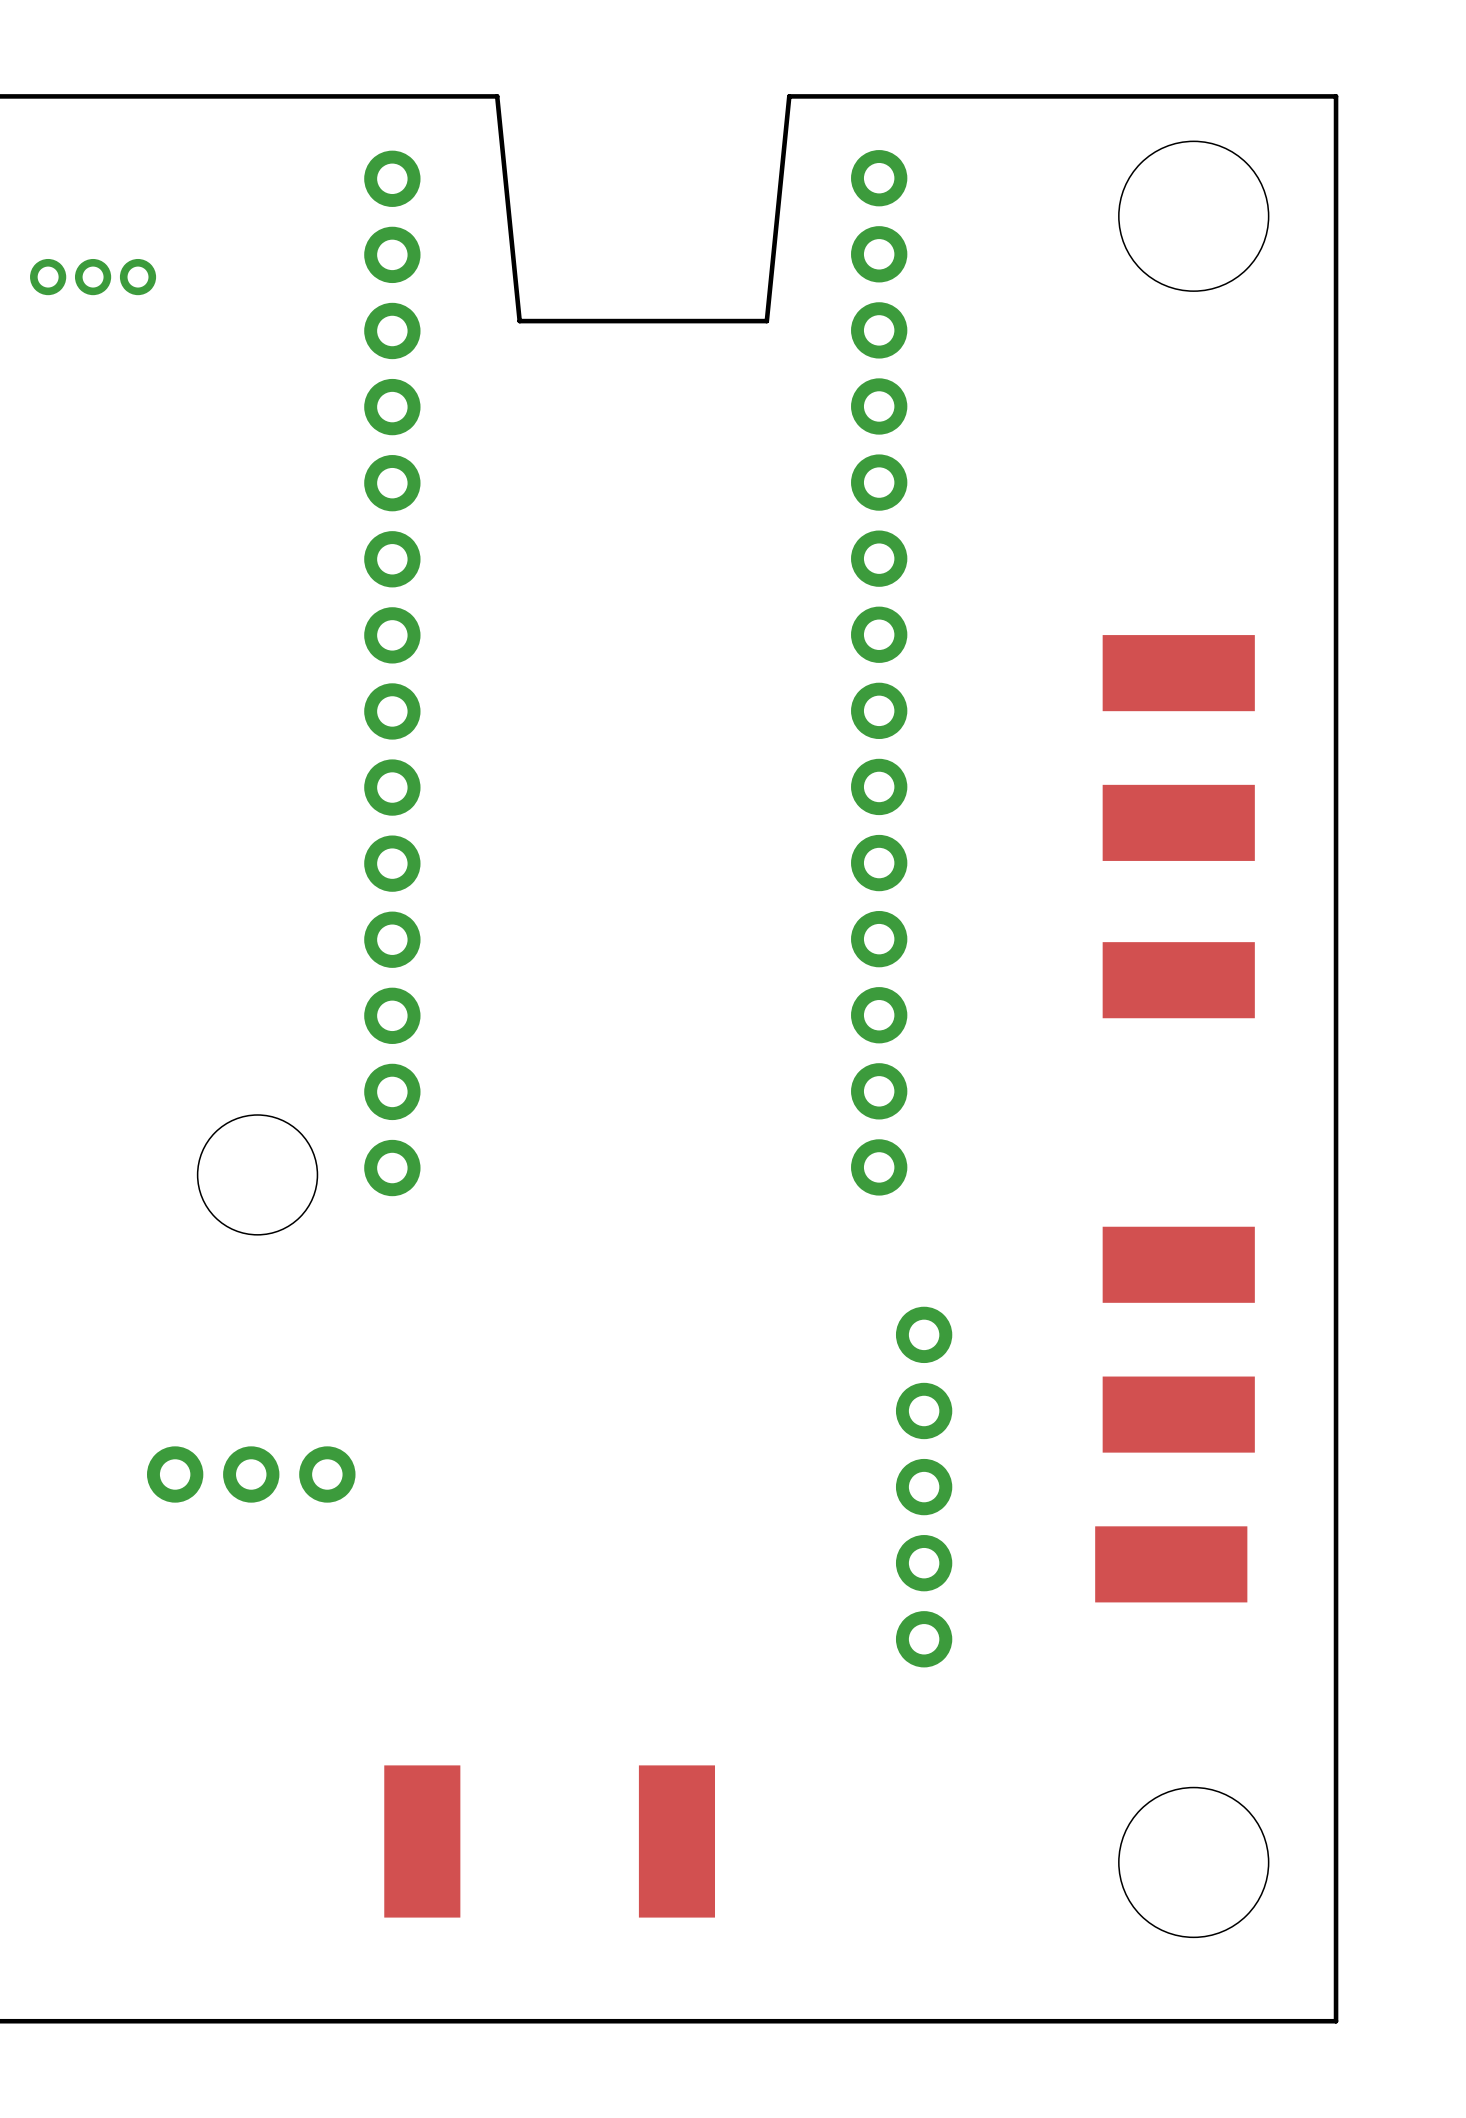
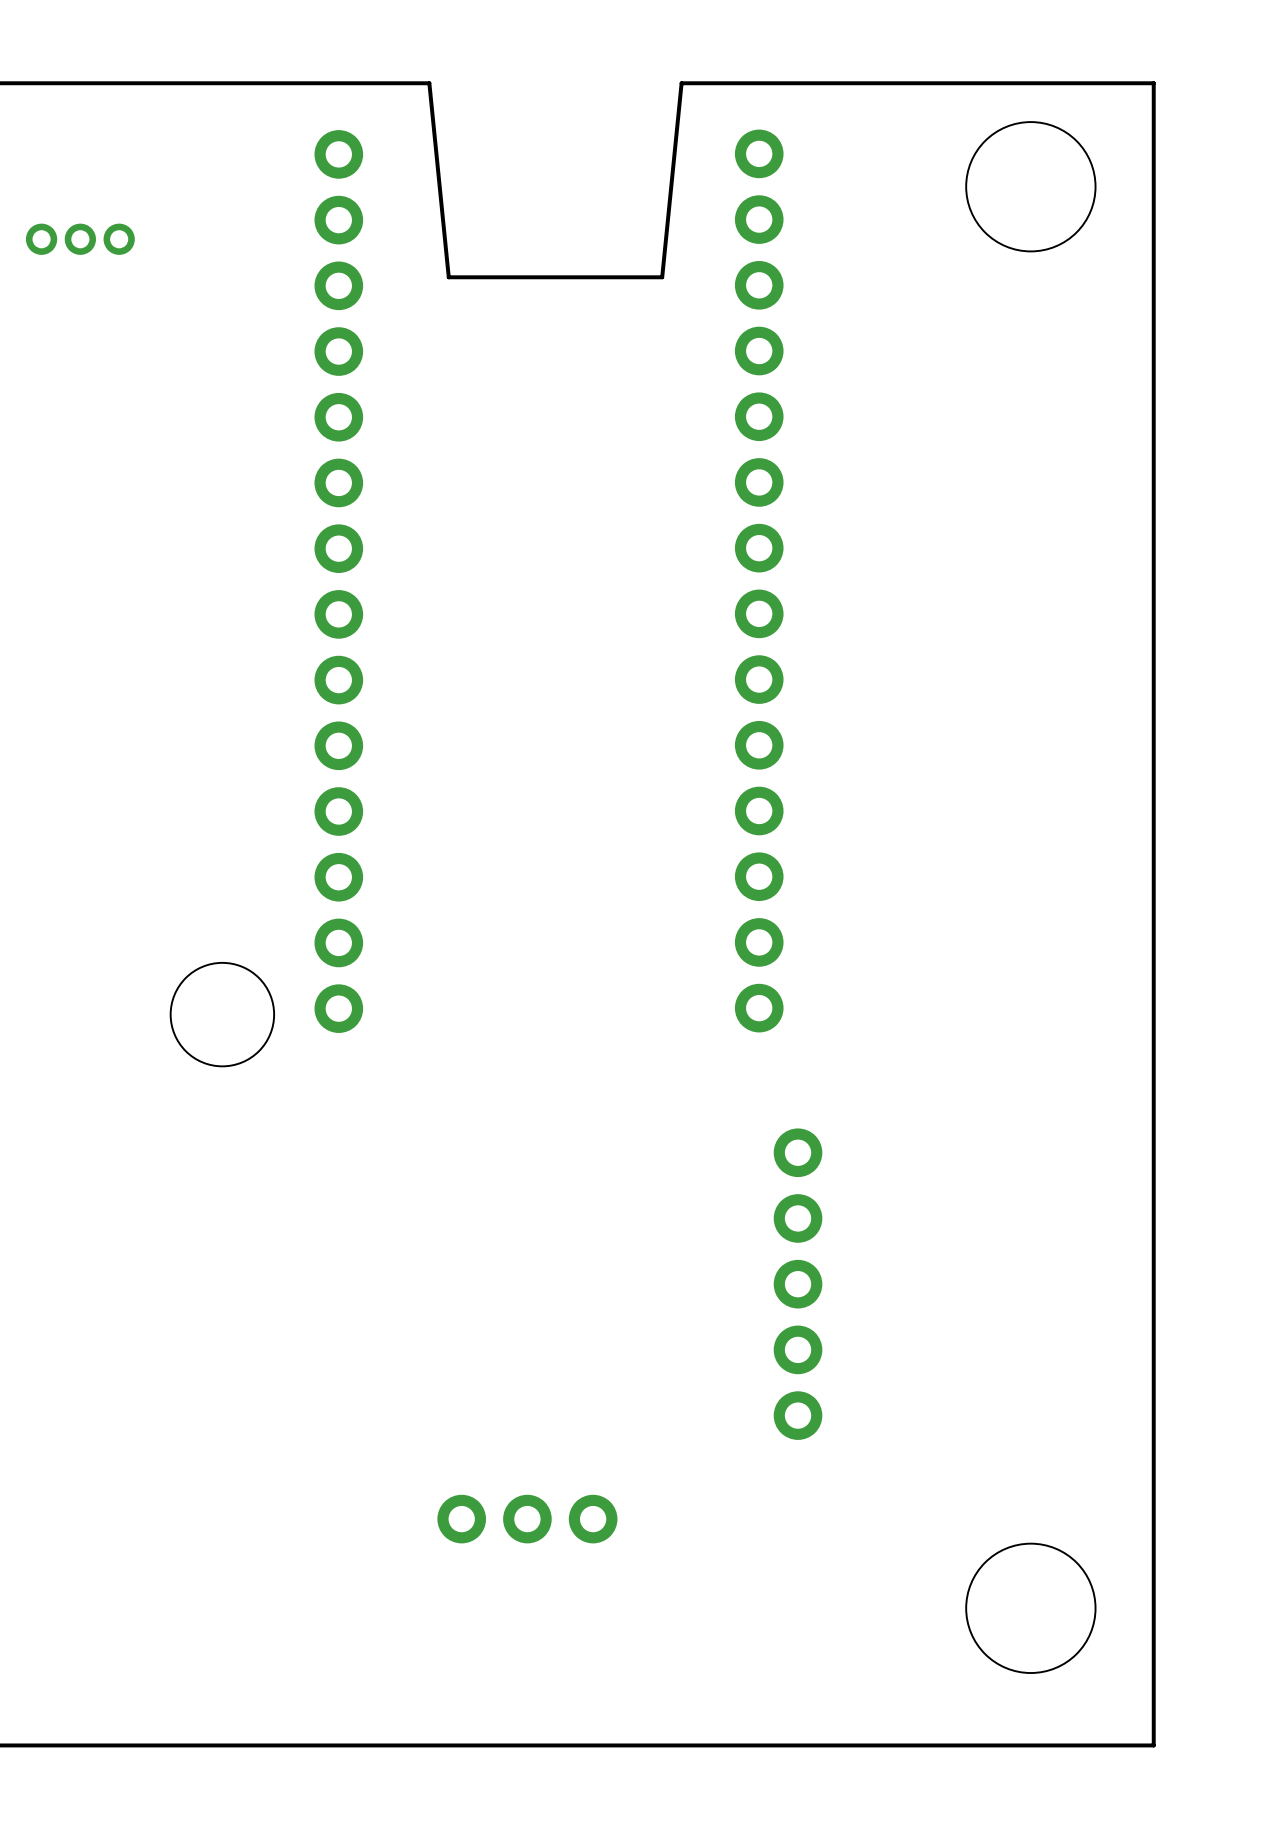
part: (1178, 673) -> none
part: (1178, 822) -> none
part: (1178, 980) -> none
part: (1178, 1264) -> none
part: (1178, 1414) -> none
part position: (251, 1474) -> (527, 1519)
part: (1171, 1564) -> none
part: (422, 1841) -> none
part: (676, 1841) -> none

